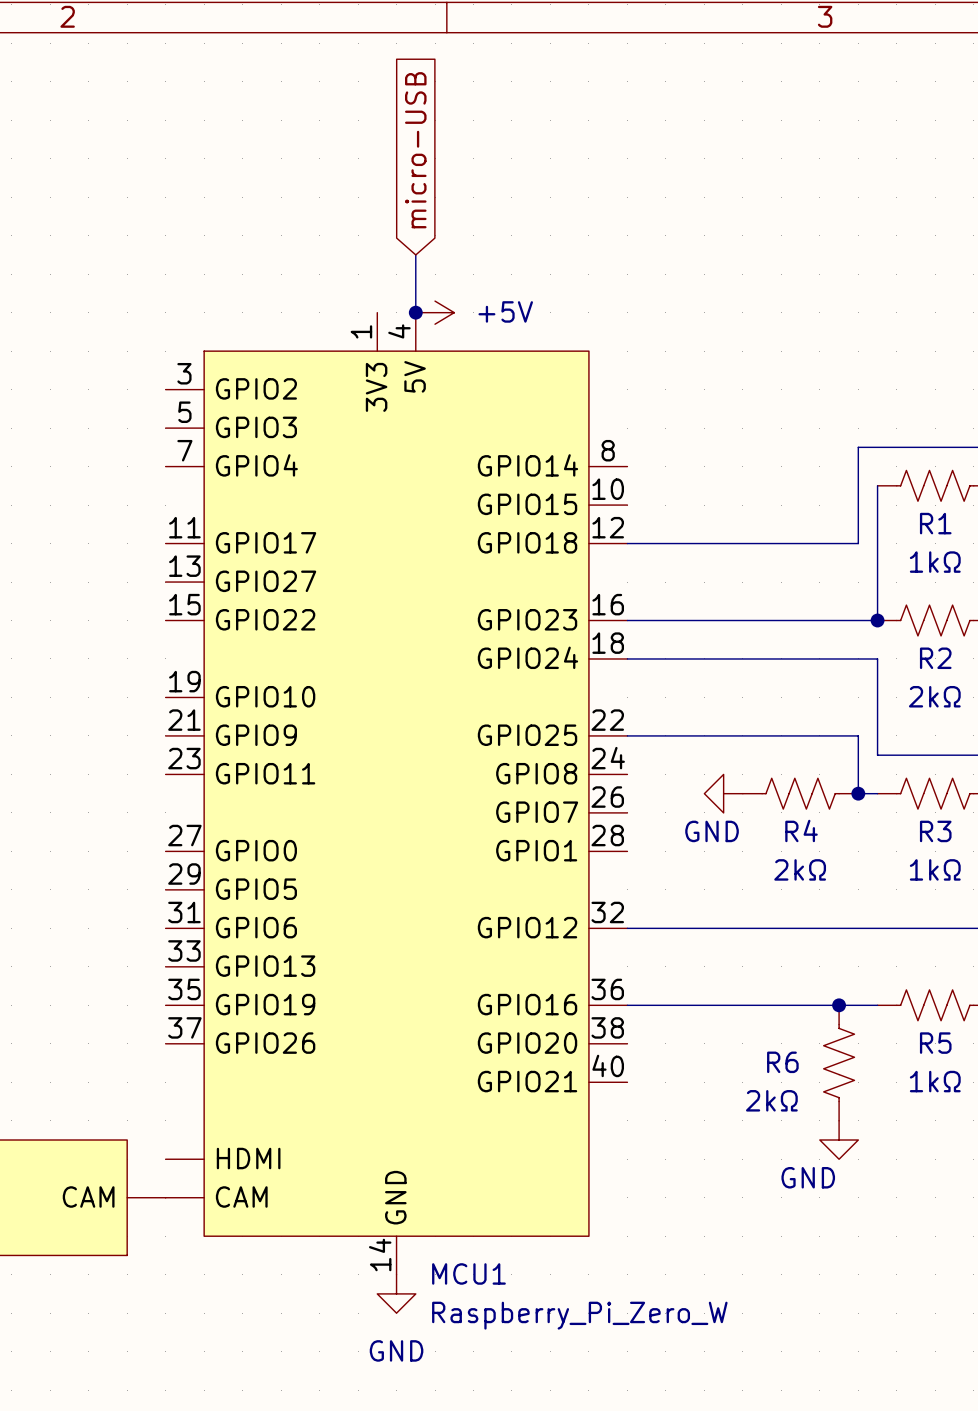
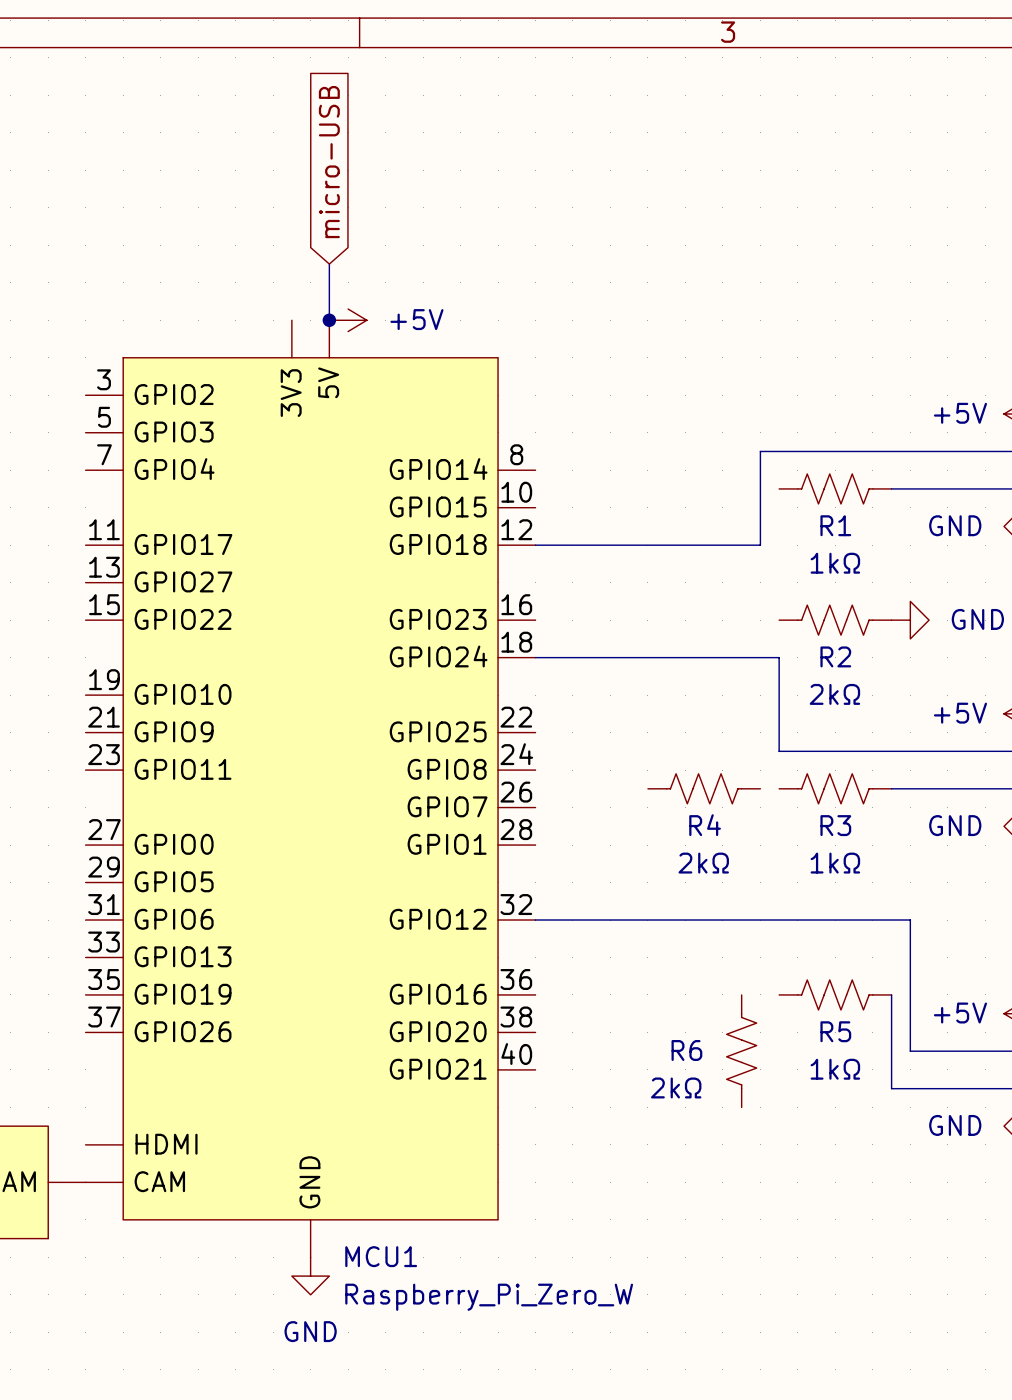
MCU1 pin number: 1 (361, 331) -> none
MCU1 pin number: 4 (399, 331) -> none
wire: (877, 485) (877, 620) (627, 620) -> none
junction: (877, 620) -> none
wire: (627, 735) (858, 735) (858, 793) (877, 793) -> none
power symbol: GND (723, 793) -> none
junction: (858, 793) -> none
wire: (627, 1005) (877, 1005) -> none
junction: (839, 1005) -> none
power symbol: GND (839, 1140) -> none
MCU1 pin number: 14 (380, 1254) -> none

